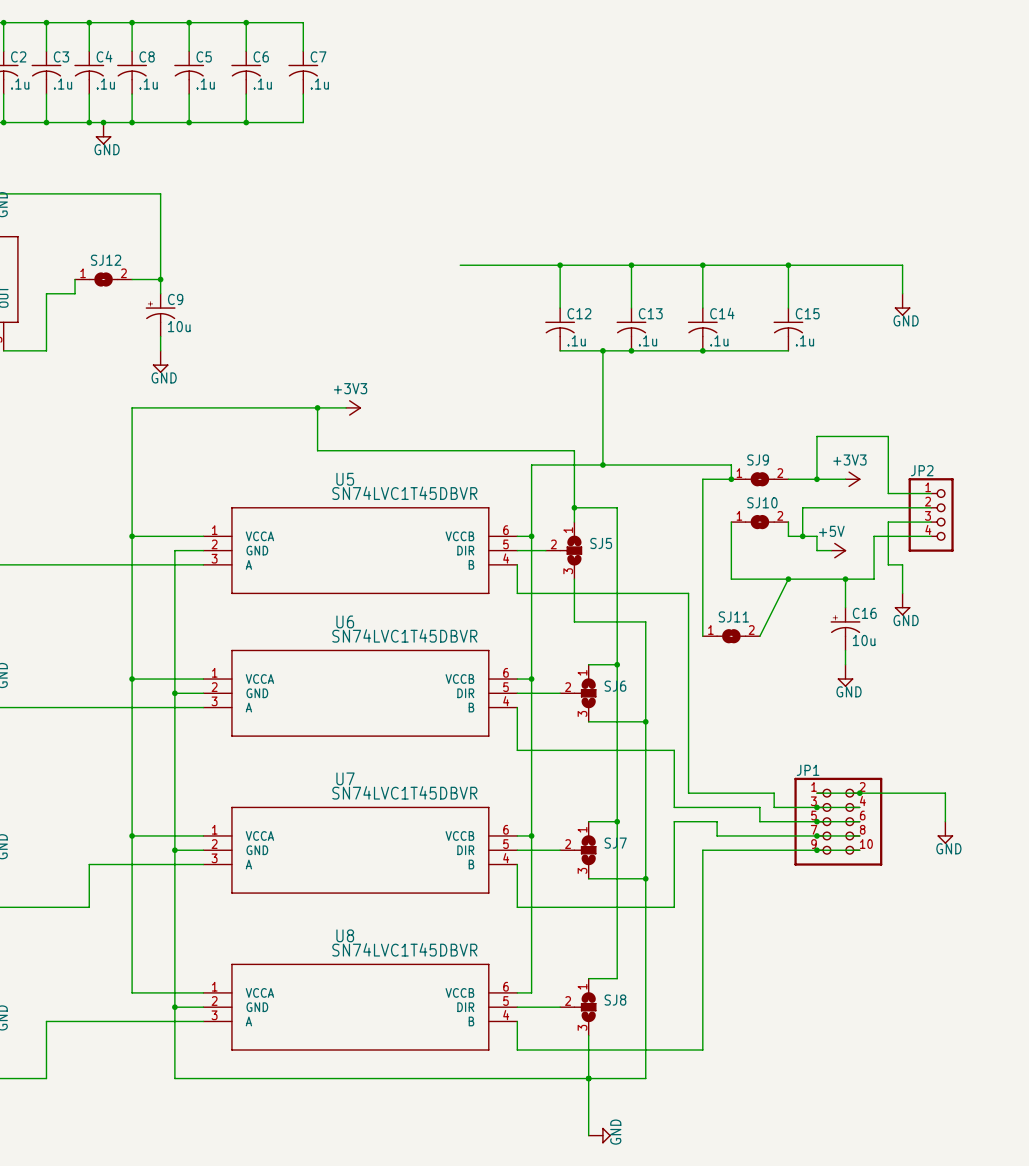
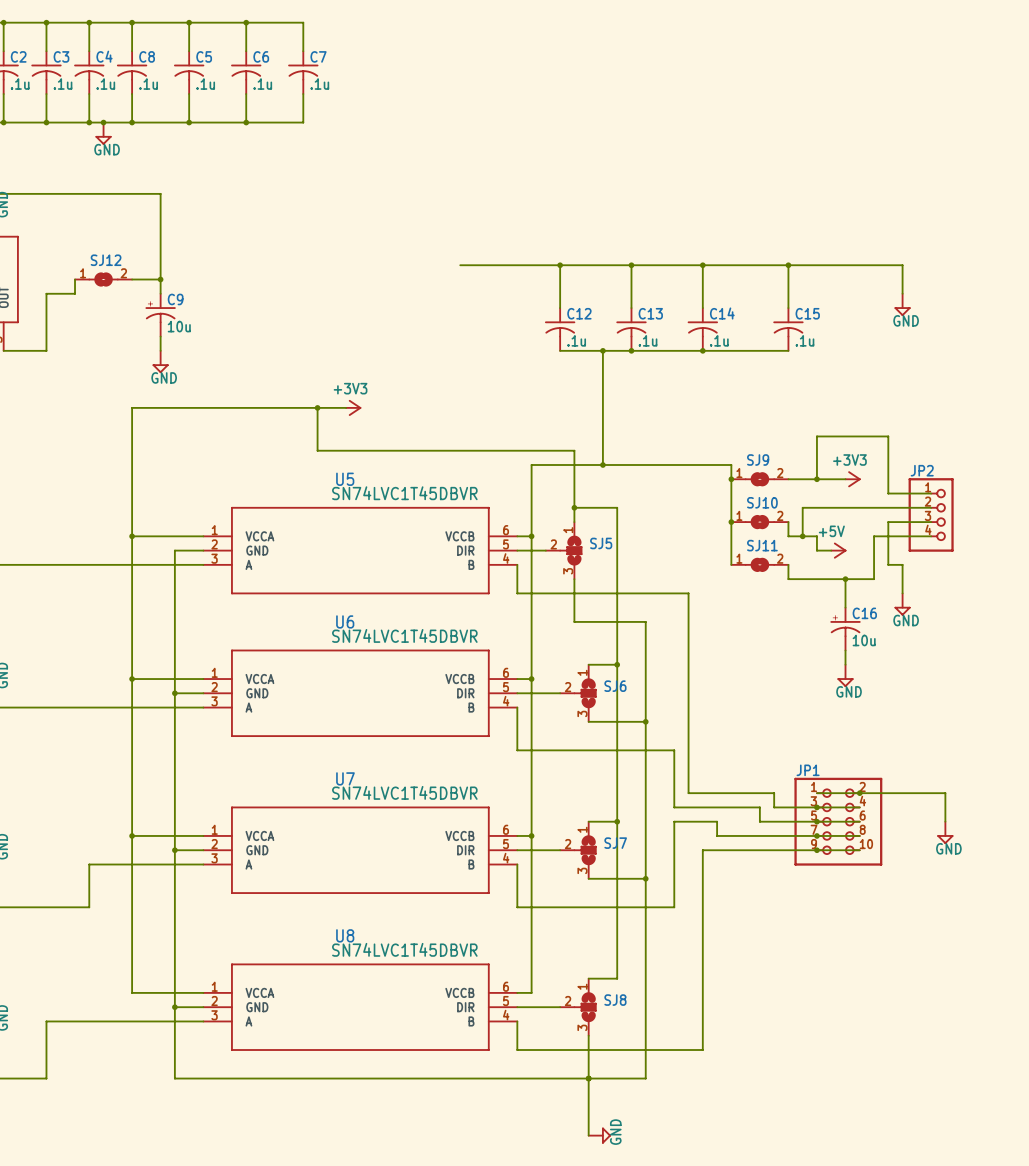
wire: (731, 479) (702, 479) (702, 636) -> (731, 479) (731, 522)
junction: none -> (731, 522)
wire: (731, 564) (731, 579) (788, 579) (759, 636) -> none
wire: none -> (788, 564) (788, 579)
junction: (788, 579) -> none
SJ11 position: (731, 636) -> (759, 564)

